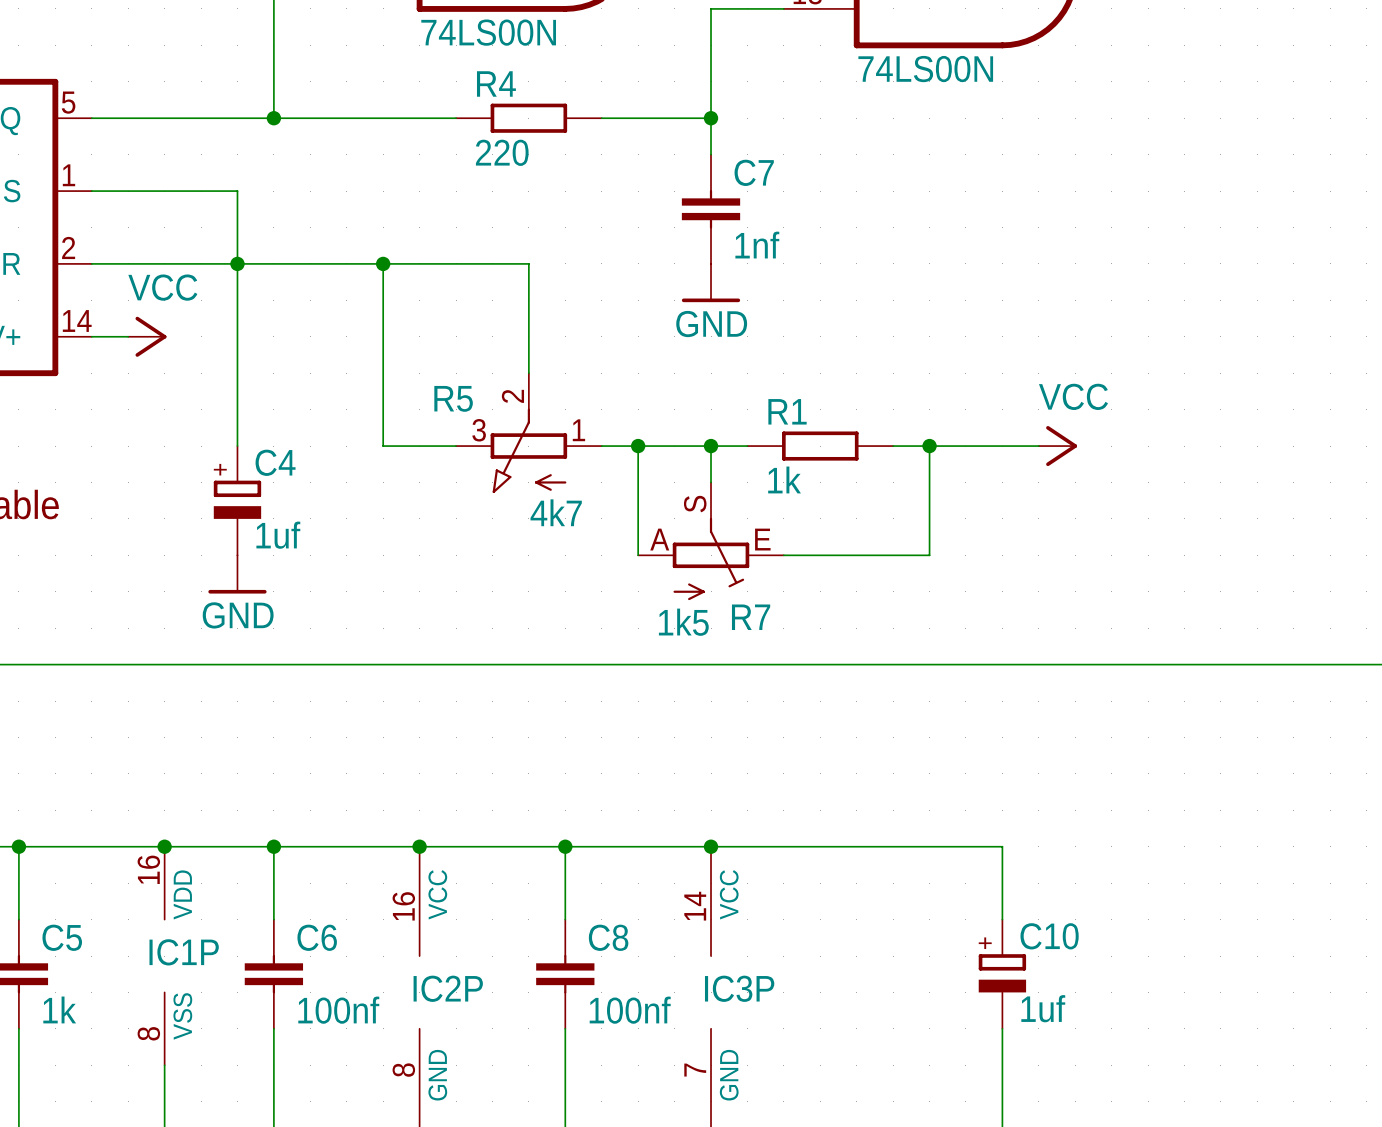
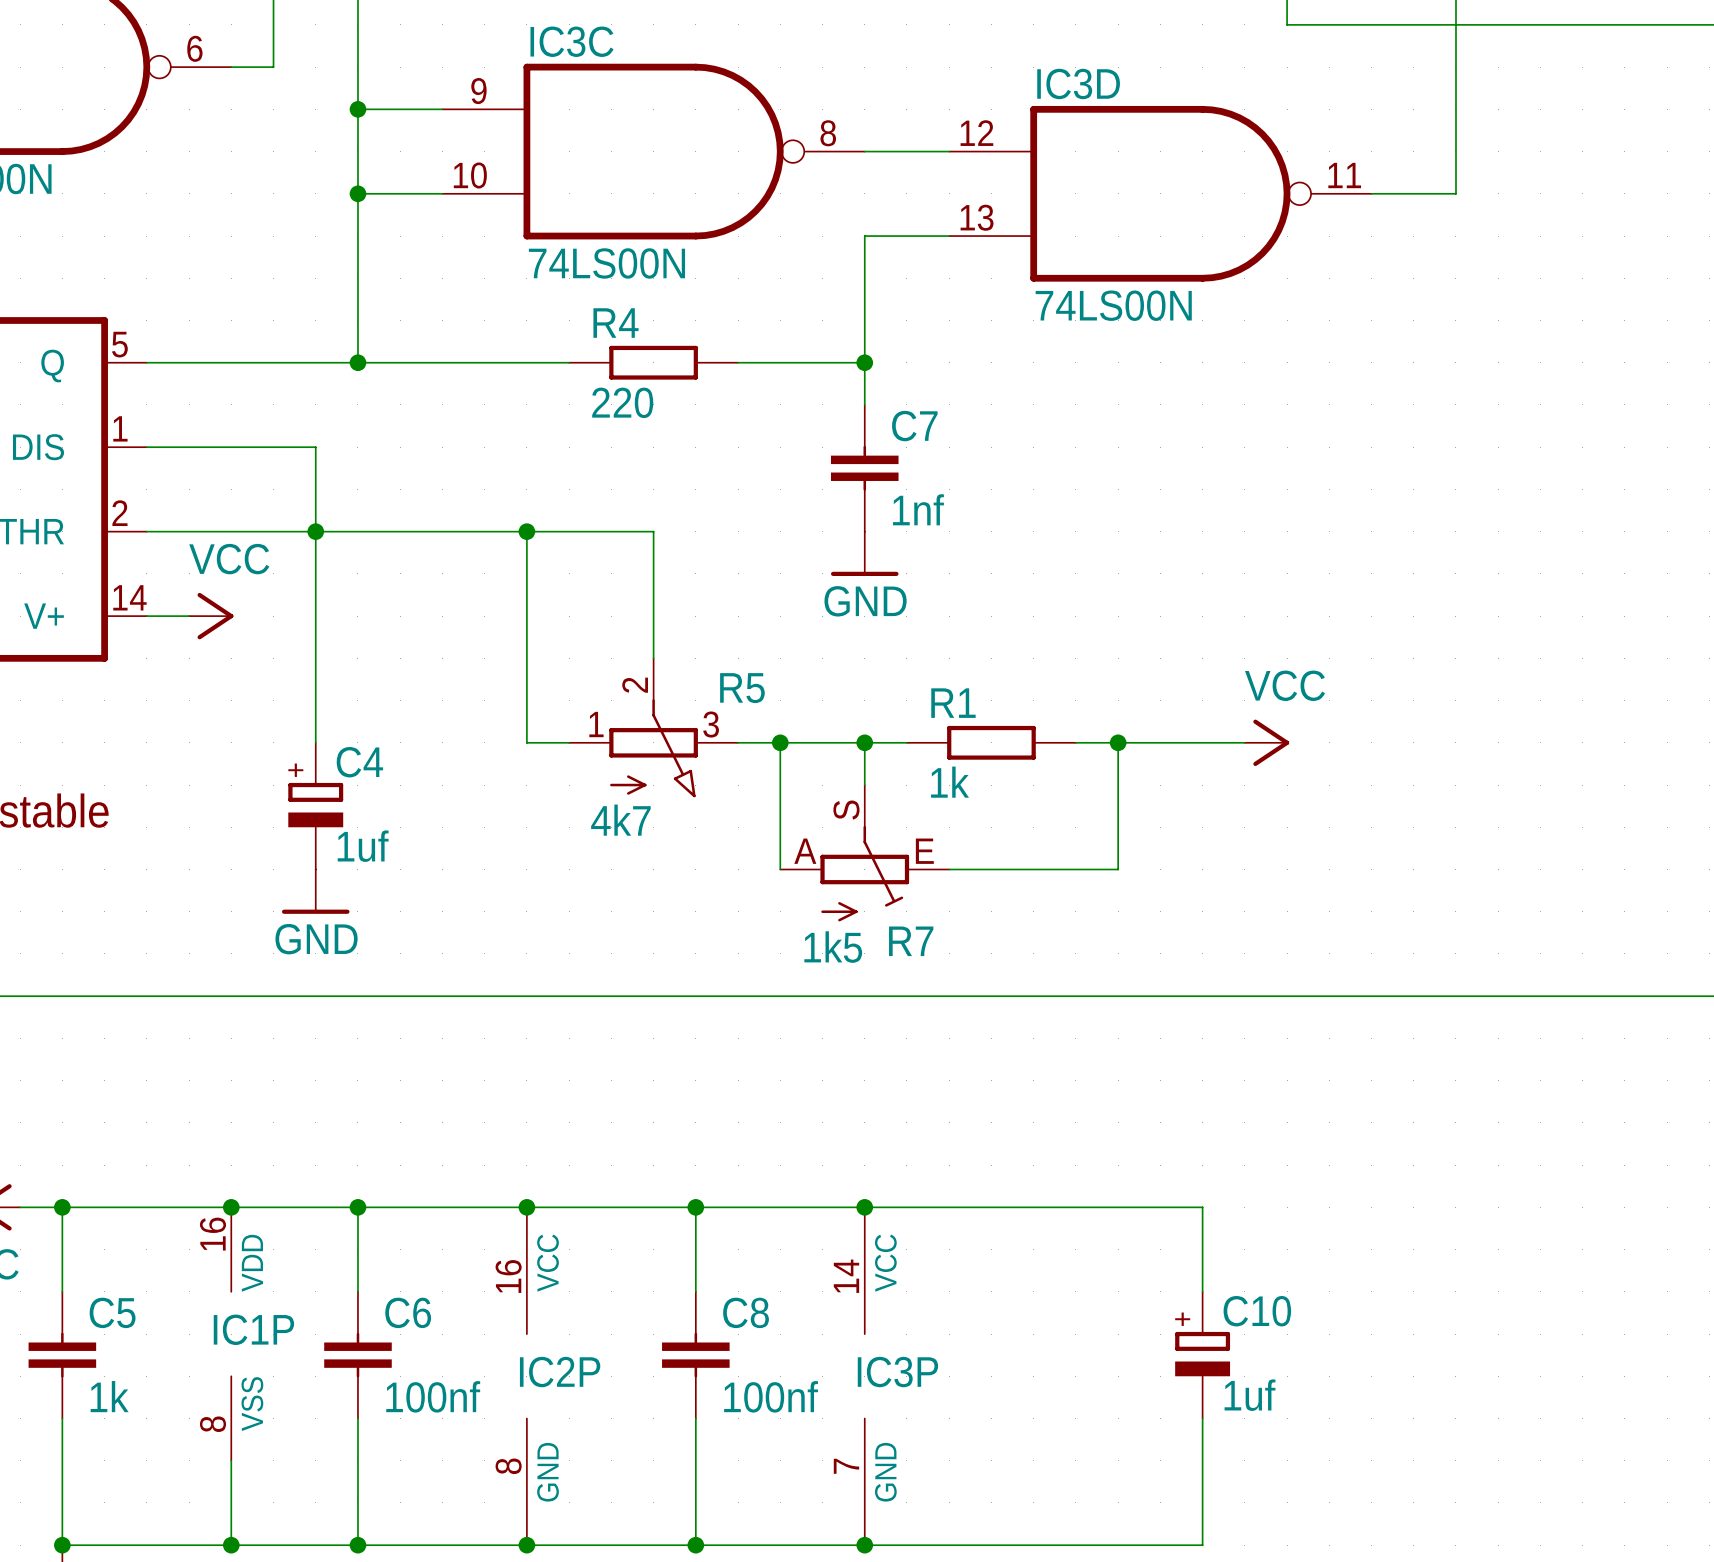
wire: (383, 263) (383, 446) (419, 446) -> (526, 531) (526, 742)
junction position: (383, 263) -> (526, 531)
R5 flip: as is (528, 450) -> left-right (653, 748)

